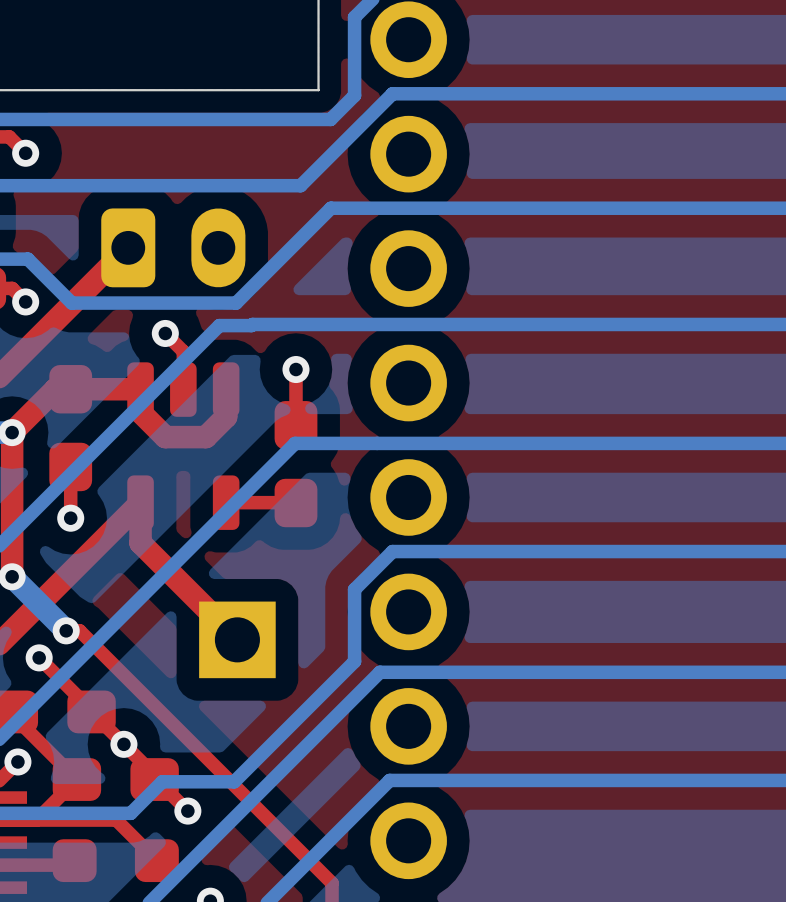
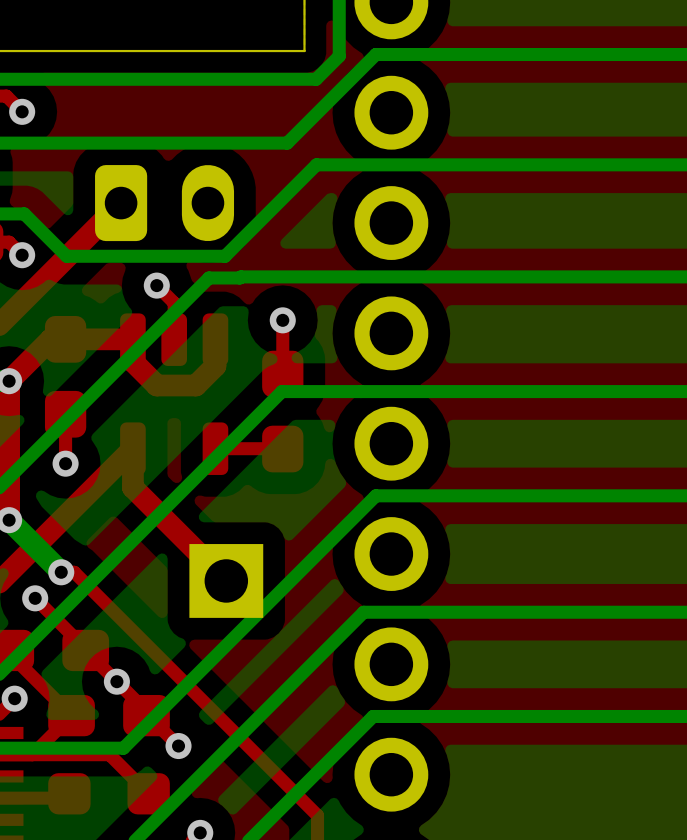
bottom track: (354, 589) (354, 661) (234, 781) (162, 781) -> (339, 532) (153, 717)

